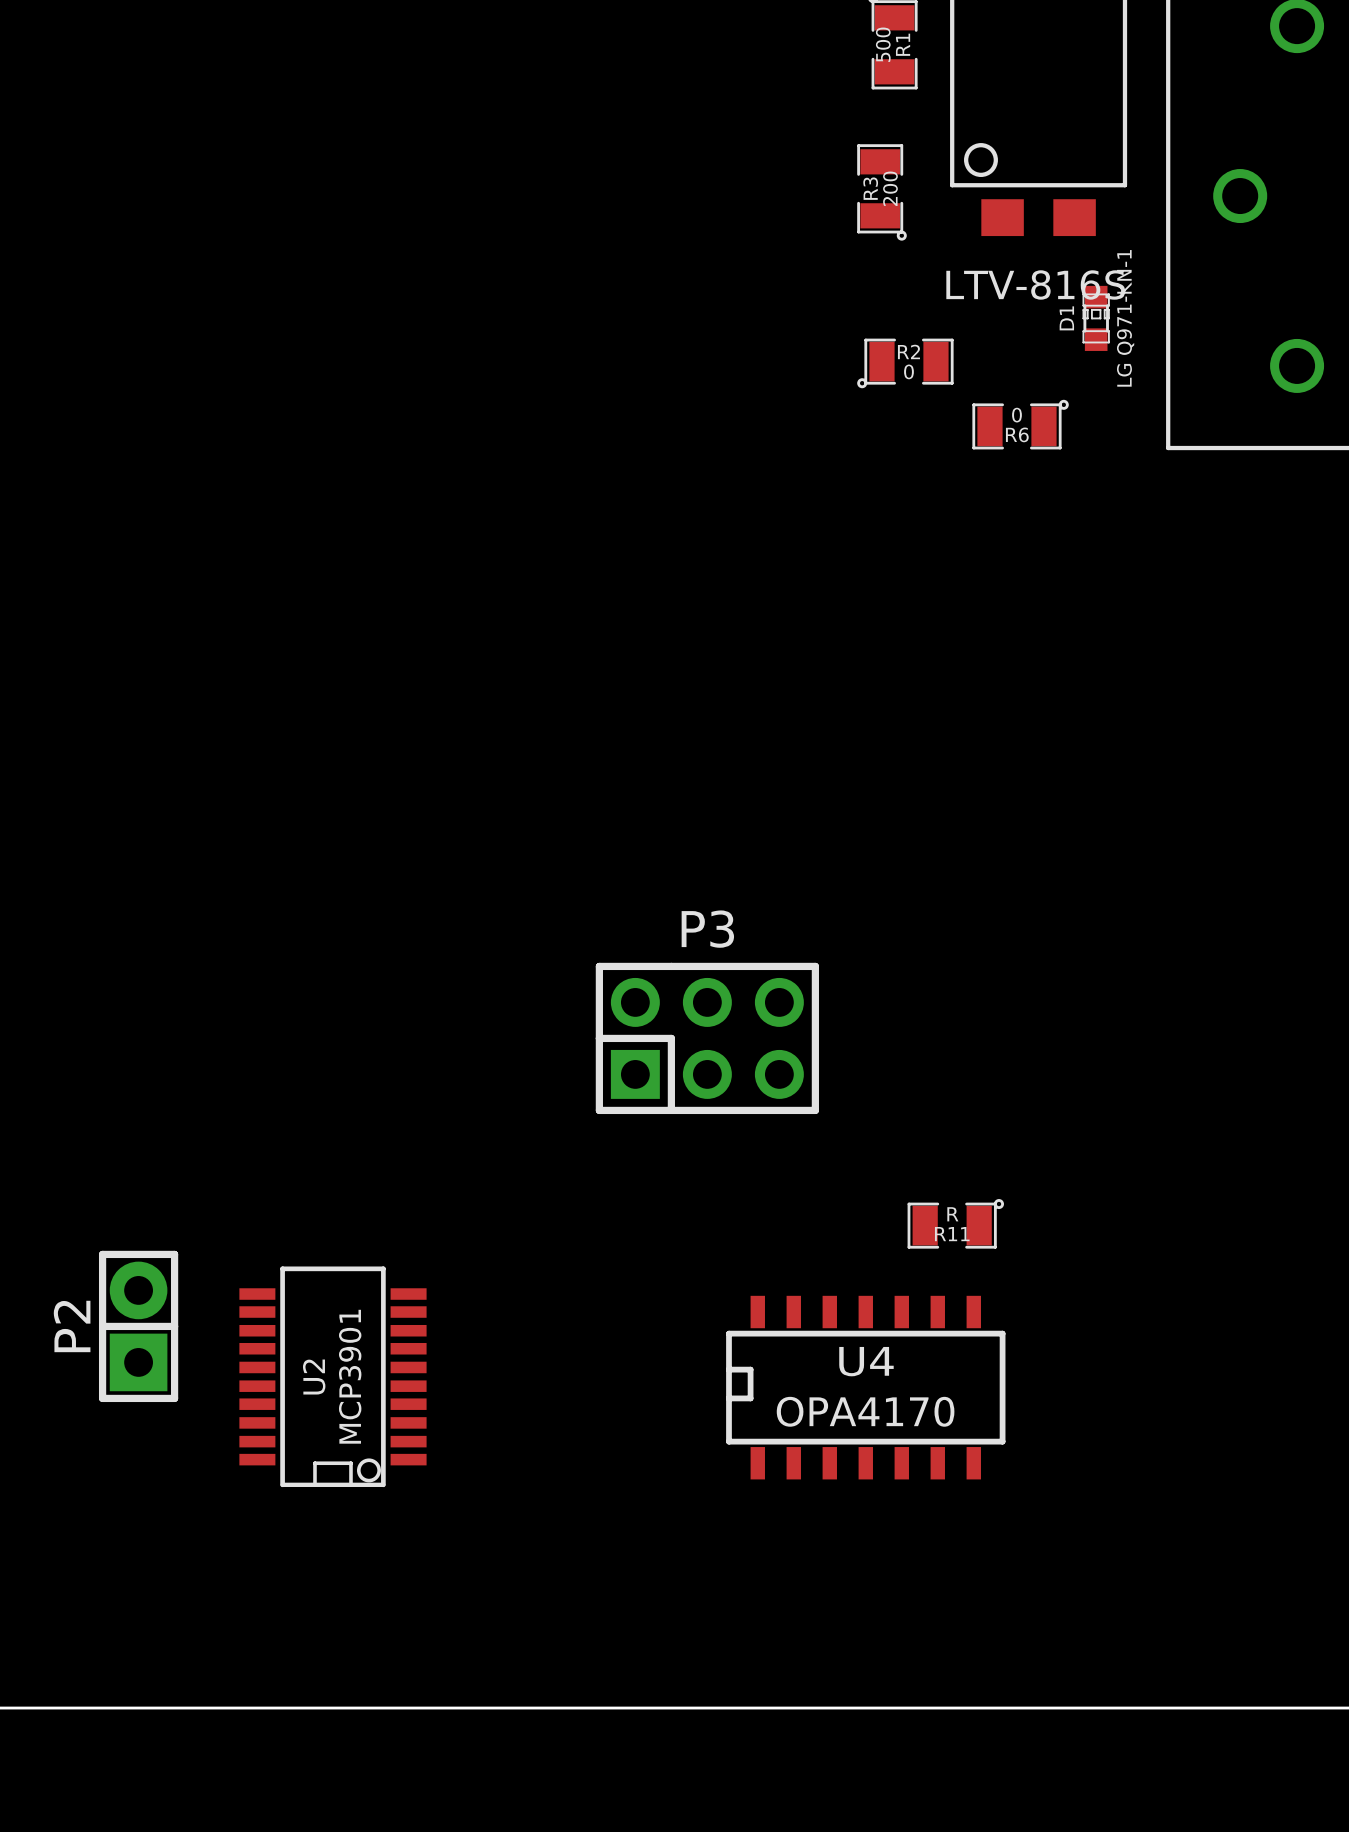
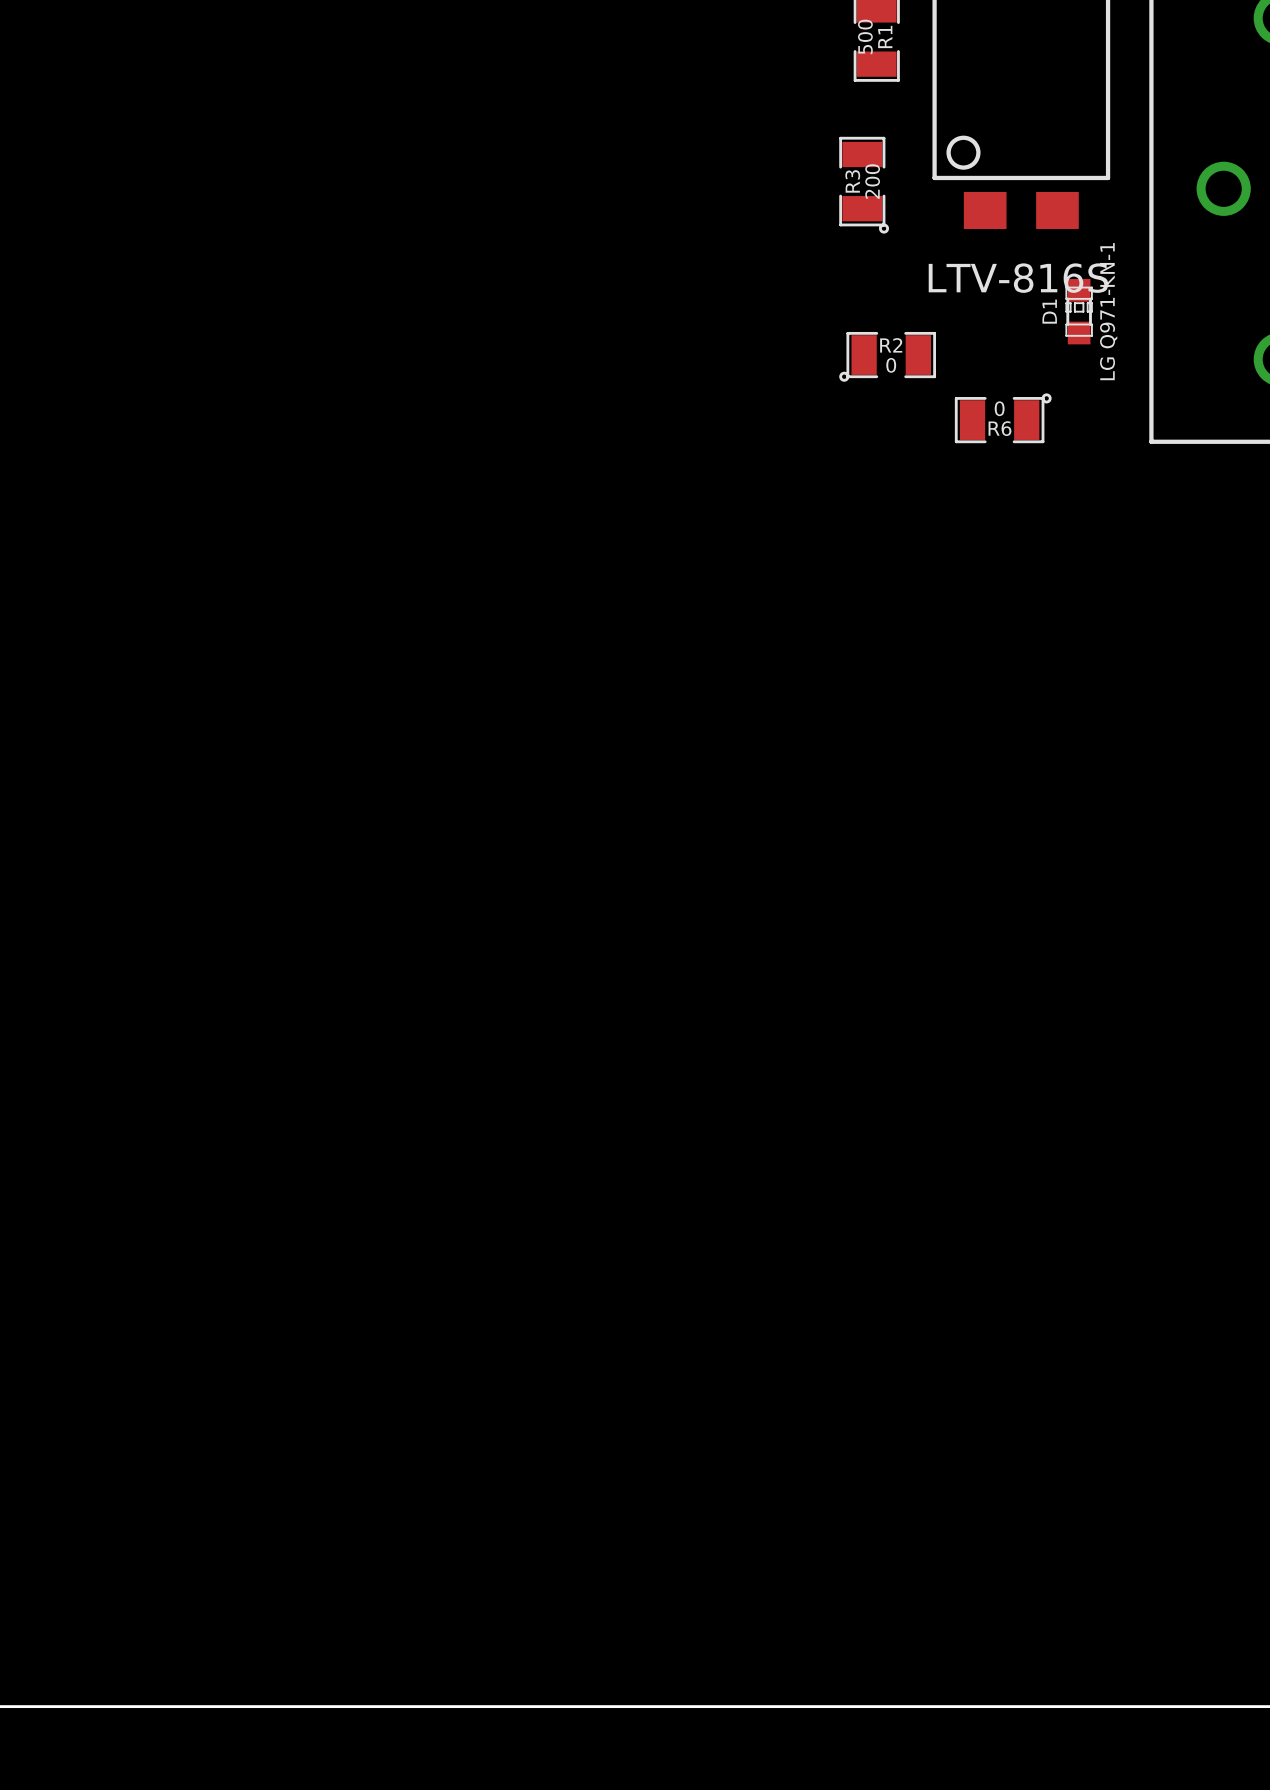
P3: (707, 1038) -> none
R11: R (955, 1223) -> none
P2: (138, 1326) -> none
U2: MCP3901 (332, 1376) -> none
U4: OPA4170 (865, 1387) -> none

